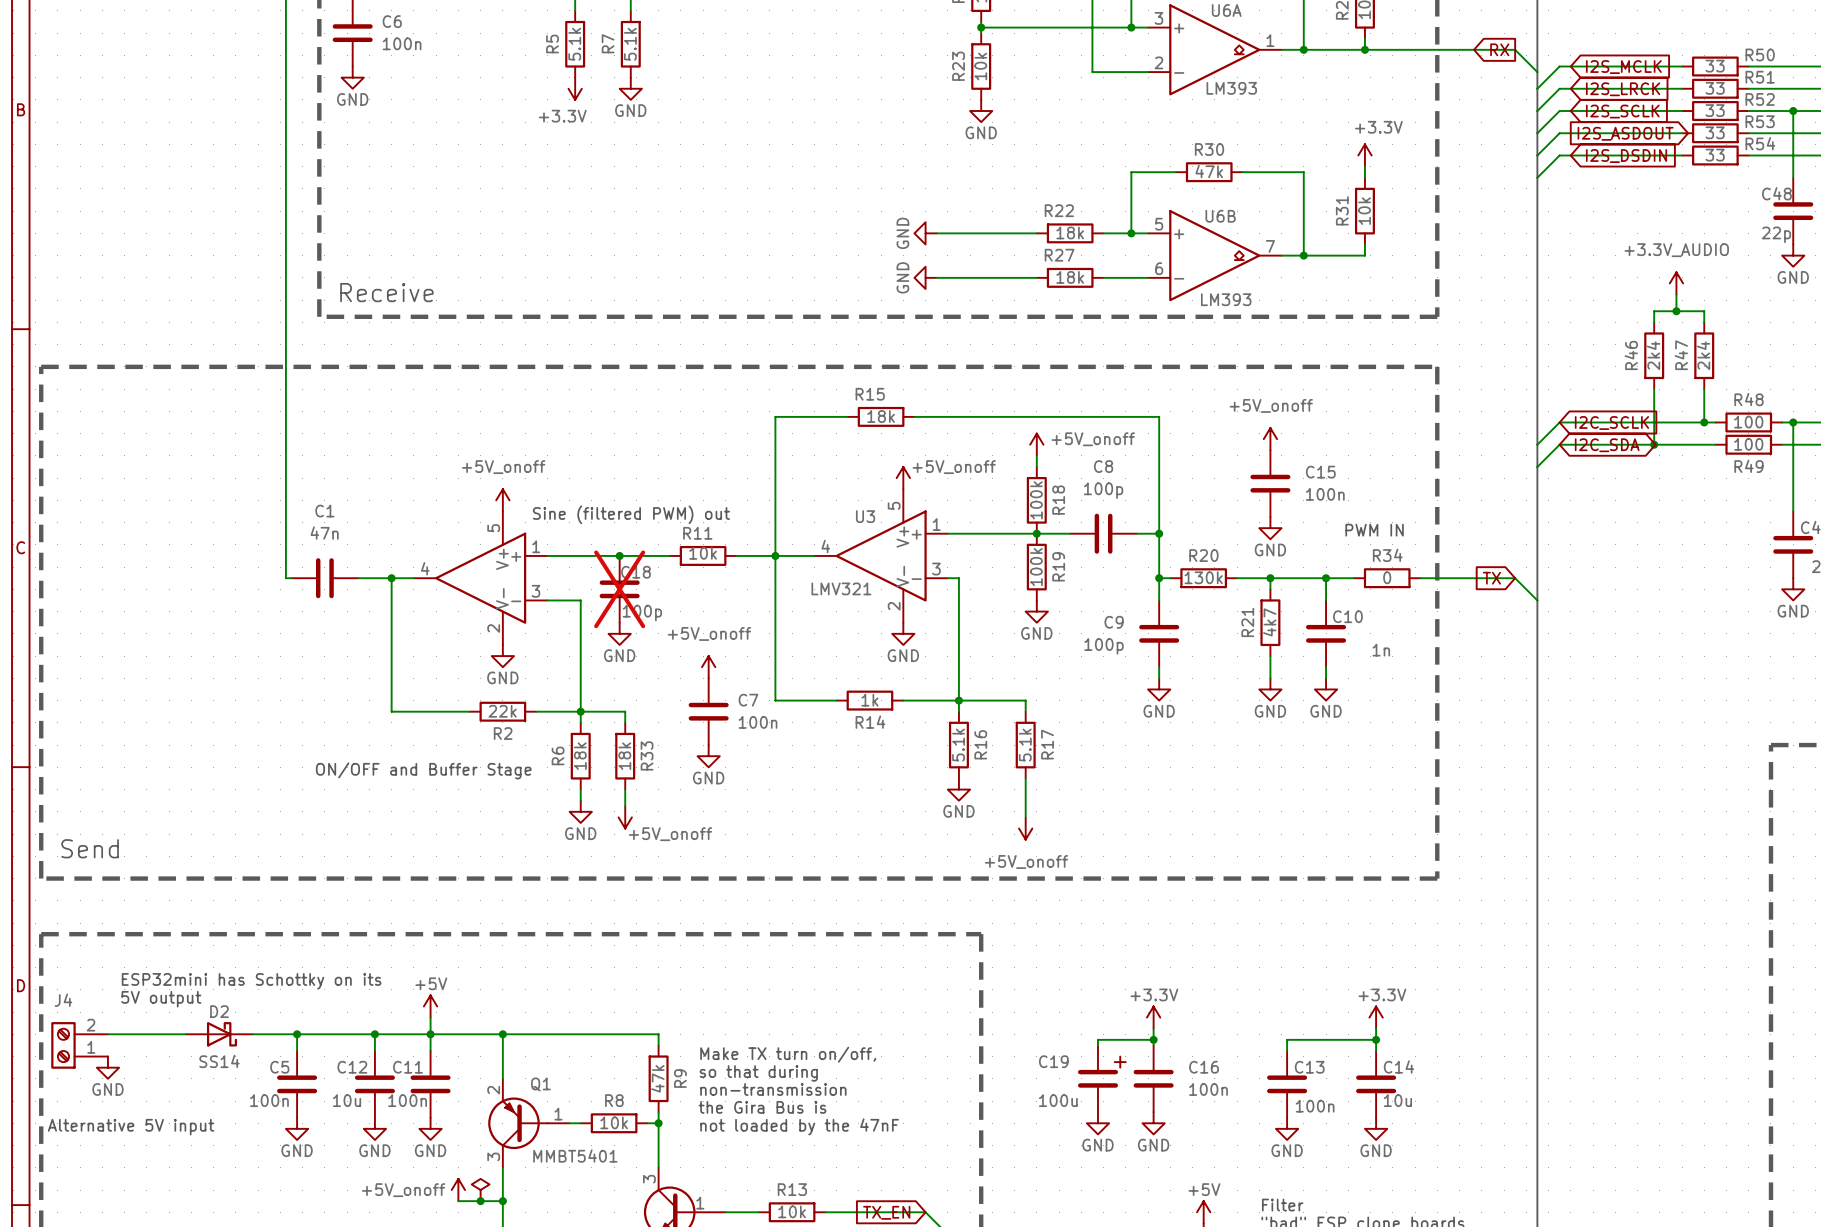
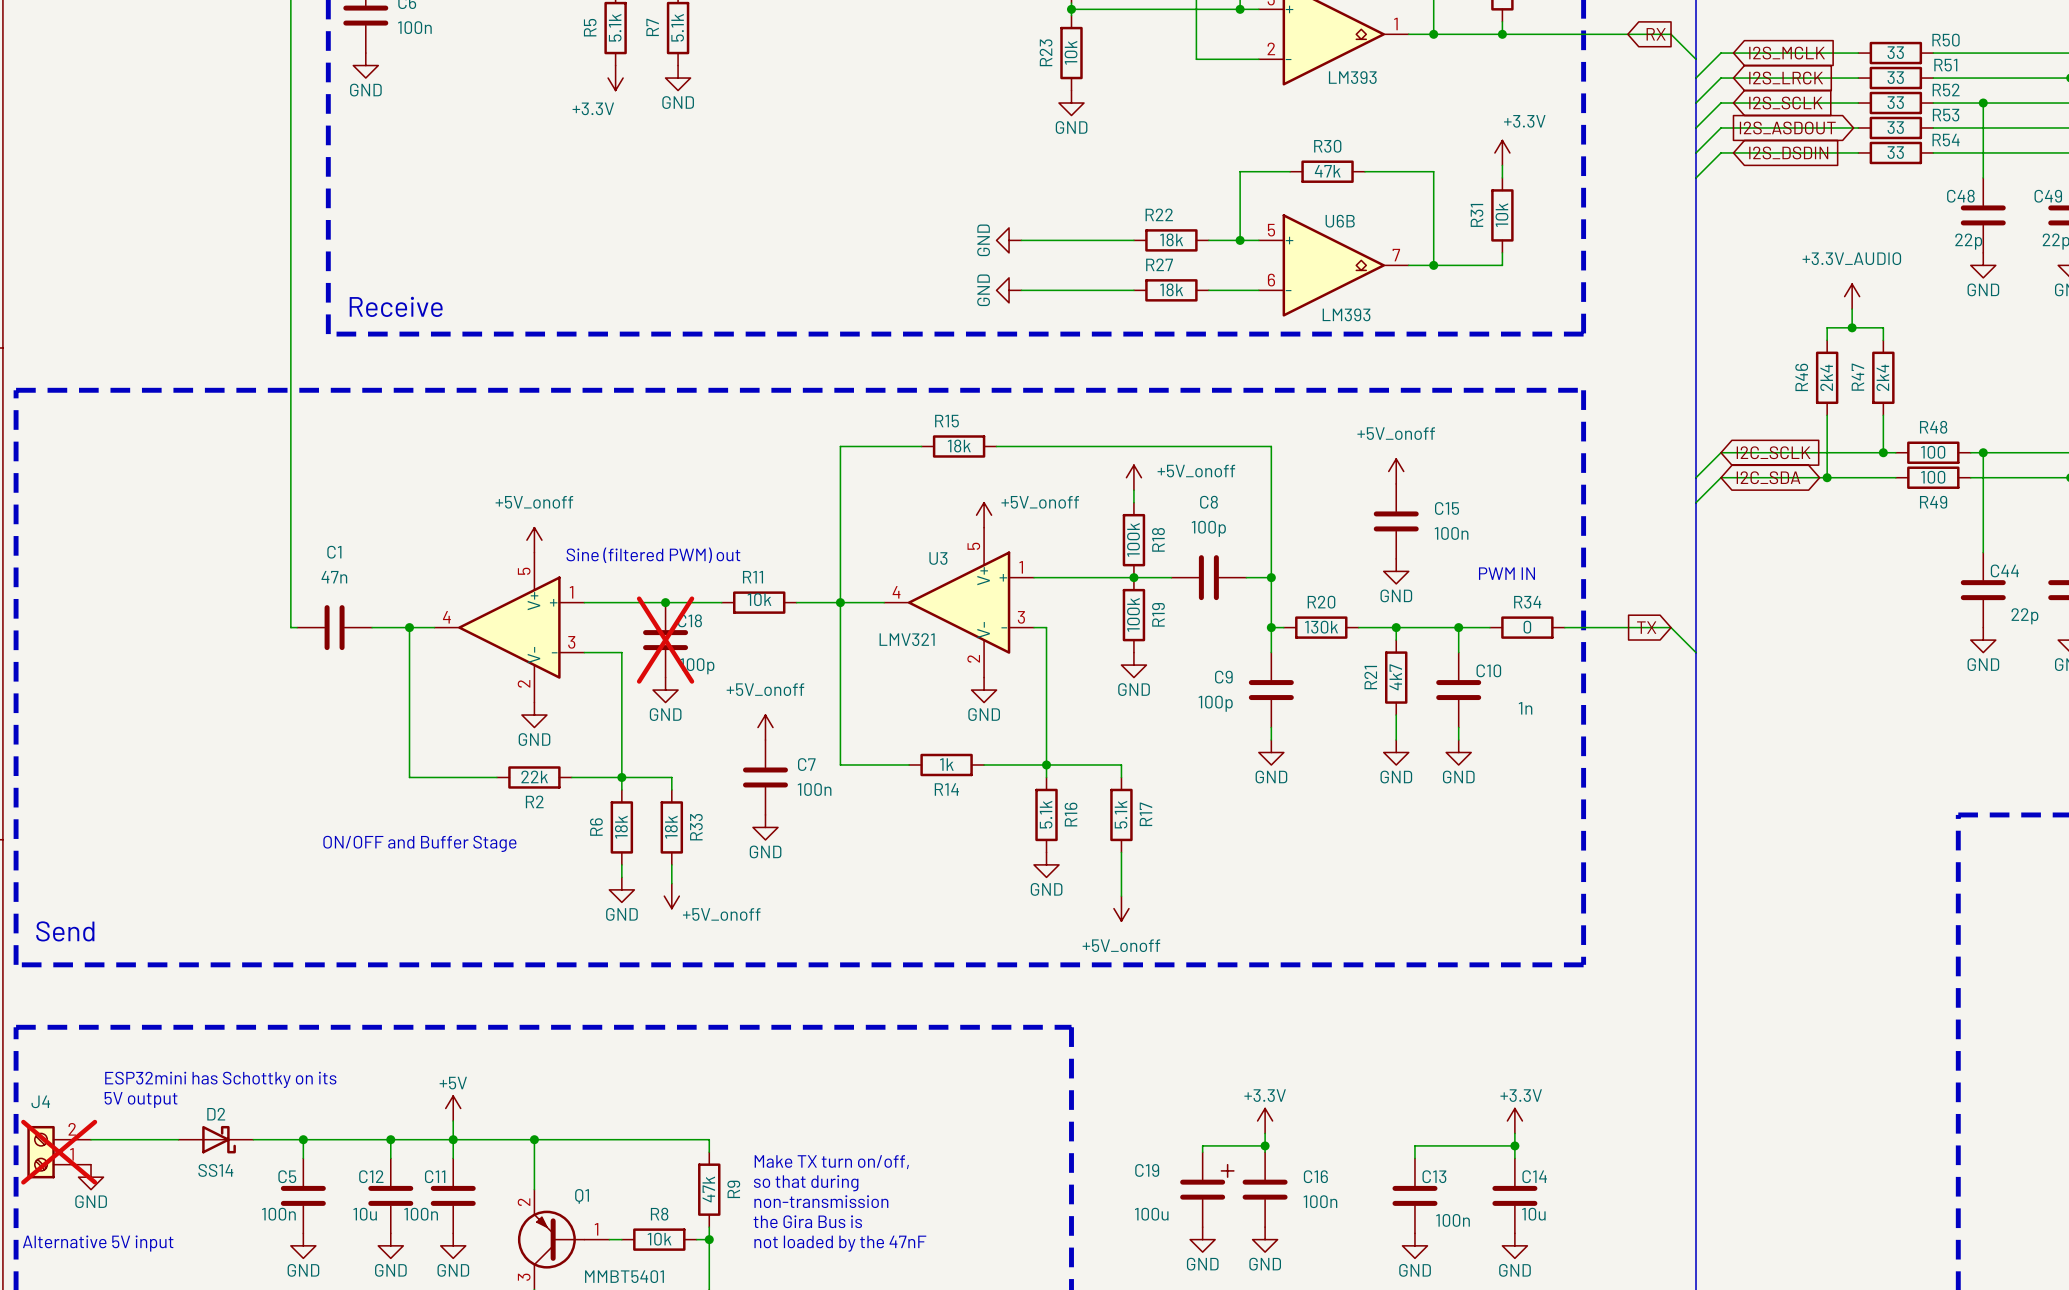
J4 do-not-place cross: none -> (59, 1152)

